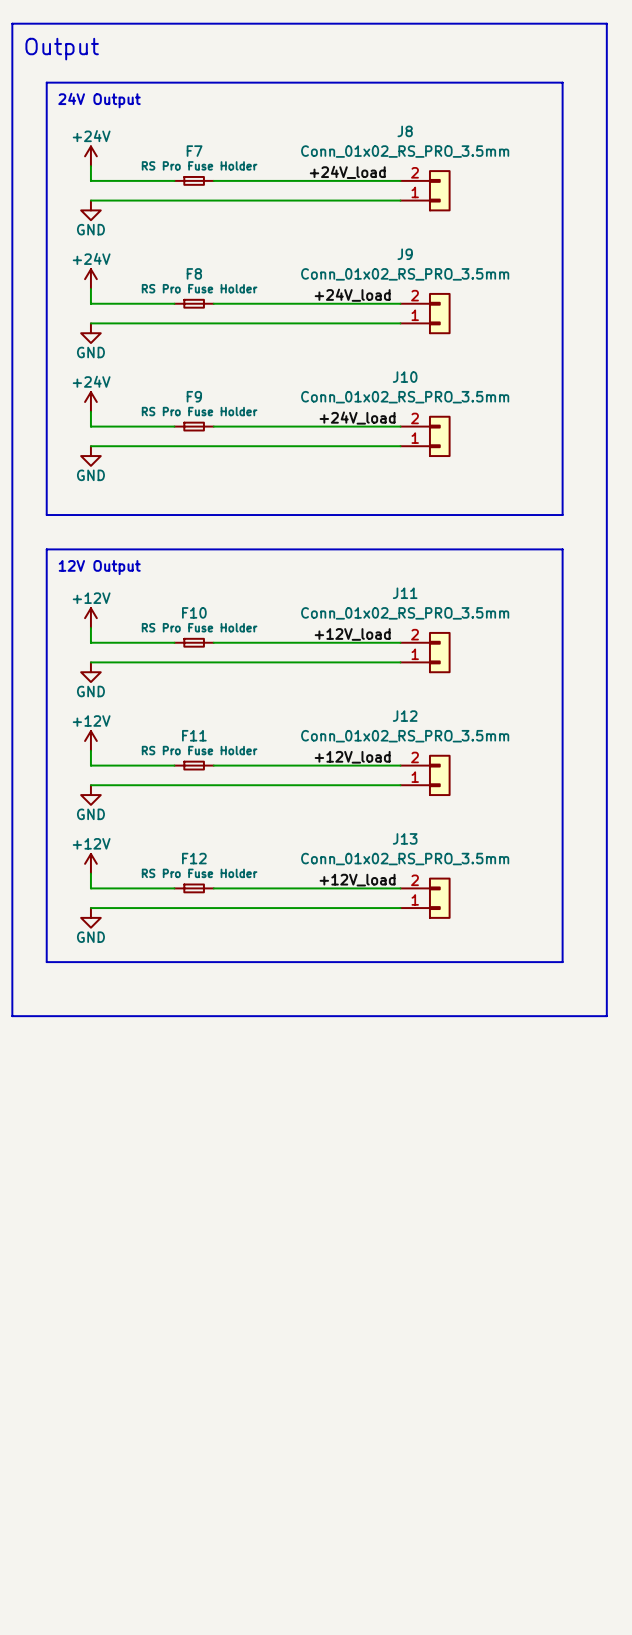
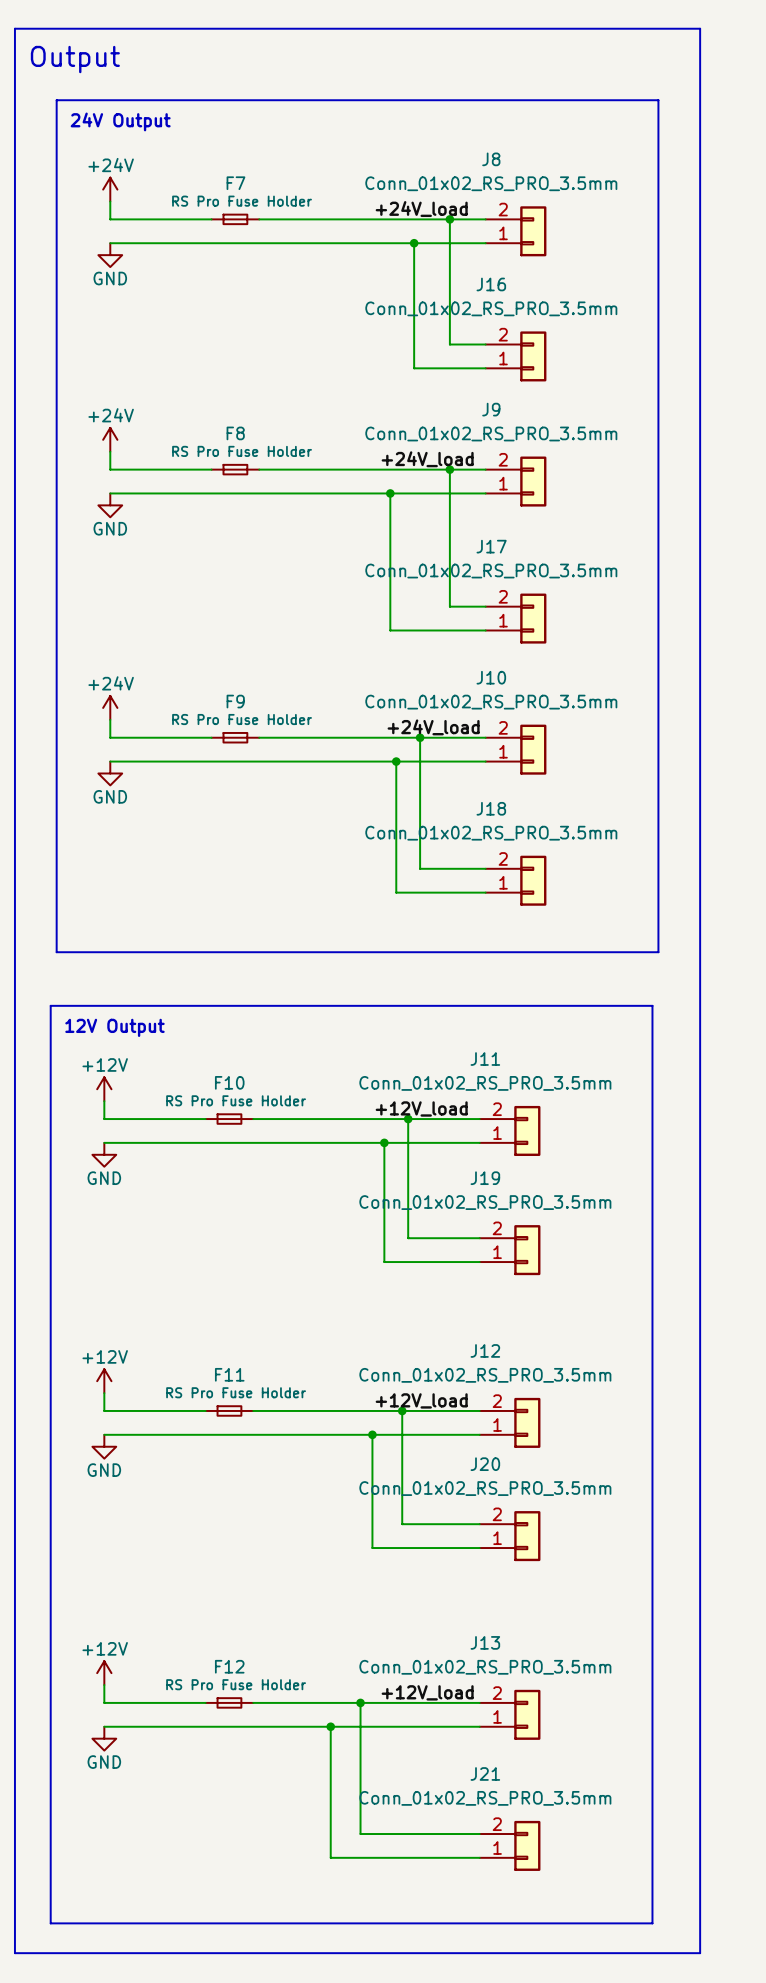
line: (577, 23) (606, 23) (606, 1016) (12, 1016) -> (700, 28) (700, 1953) (14, 1953) (14, 1232)
line: (542, 82) (562, 82) (562, 515) (46, 515) -> (658, 100) (658, 952) (56, 952)
wire: none -> (449, 219) (449, 344) (485, 344)
junction: none -> (449, 219)
junction: none -> (414, 243)
power symbol: +24V (90, 279) -> none
wire: (90, 289) (90, 303) (174, 303) -> none
J16: none -> Conn_01x02_RS_PRO_3.5mm (516, 356)
label: +24V_load (352, 295) -> none
F8 position: (194, 303) -> (235, 469)
wire: (213, 303) (341, 303) -> (414, 243) (414, 368)
J9 position: (425, 313) -> (516, 481)
wire: (90, 323) (400, 323) -> none
power symbol: GND (90, 333) -> none
wire: none -> (449, 469) (449, 606) (485, 606)
junction: none -> (449, 469)
power symbol position: +24V (90, 402) -> +24V (110, 439)
wire: none -> (390, 493) (390, 630) (485, 630)
junction: none -> (390, 493)
wire: (90, 411) (90, 426) (174, 426) -> (110, 451) (110, 469) (211, 469)
label position: +24V_load (357, 418) -> +24V_load (427, 459)
F9 position: (194, 426) -> (235, 737)
wire: (213, 426) (400, 426) -> (259, 469) (485, 469)
J10 position: (425, 436) -> (516, 749)
wire: (90, 446) (400, 446) -> (110, 493) (485, 493)
power symbol position: GND (90, 456) -> GND (110, 505)
J17: none -> Conn_01x02_RS_PRO_3.5mm (516, 618)
line: (46, 549) (562, 549) (562, 962) (46, 962) (46, 785) -> (56, 666) (56, 624)
text: 12V Output (99, 567) -> none
power symbol: none -> +24V (110, 707)
label: none -> +24V_load (433, 727)
wire: none -> (420, 737) (420, 868) (485, 868)
junction: none -> (420, 737)
power symbol: +12V (90, 618) -> none
wire: (90, 628) (90, 642) (174, 642) -> (110, 761) (485, 761)
wire: none -> (396, 761) (396, 892) (485, 892)
junction: none -> (396, 761)
label: +12V_load (352, 634) -> none
F10 position: (194, 642) -> (229, 1119)
wire: (213, 642) (400, 642) -> (259, 737) (485, 737)
J11 position: (425, 652) -> (510, 1130)
wire: (90, 662) (400, 662) -> none
power symbol position: GND (90, 672) -> GND (110, 773)
J18: none -> Conn_01x02_RS_PRO_3.5mm (516, 880)
power symbol: +12V (90, 741) -> none
wire: (90, 750) (90, 765) (174, 765) -> (110, 719) (110, 737) (211, 737)
label: +12V_load (352, 757) -> none
F11 position: (194, 765) -> (229, 1410)
wire: (213, 765) (400, 765) -> none
J12 position: (425, 775) -> (510, 1422)
power symbol: GND (90, 795) -> none
line: none -> (50, 1005) (652, 1005) (652, 1923) (50, 1923) (50, 1005)
text: none -> 12V Output (114, 1027)
power symbol position: +12V (90, 863) -> +12V (104, 1089)
wire: (90, 873) (90, 888) (174, 888) -> (104, 1101) (104, 1119) (205, 1119)
label position: +12V_load (357, 880) -> +12V_load (421, 1108)
F12 position: (194, 888) -> (229, 1702)
wire: (213, 888) (400, 888) -> (253, 1119) (479, 1119)
J13 position: (425, 898) -> (510, 1714)
wire: (90, 908) (400, 908) -> (104, 1142) (479, 1142)
power symbol position: GND (90, 917) -> GND (104, 1154)
wire: none -> (408, 1119) (408, 1238) (479, 1238)
junction: none -> (408, 1119)
wire: none -> (384, 1142) (384, 1262) (479, 1262)
junction: none -> (384, 1142)
J19: none -> Conn_01x02_RS_PRO_3.5mm (510, 1250)
power symbol: none -> +12V (104, 1381)
wire: none -> (104, 1393) (104, 1410) (205, 1410)
label: none -> +12V_load (421, 1400)
wire: none -> (253, 1410) (479, 1410)
wire: none -> (402, 1410) (402, 1524) (479, 1524)
junction: none -> (402, 1410)
wire: none -> (104, 1434) (479, 1434)
wire: none -> (372, 1434) (372, 1548) (479, 1548)
junction: none -> (372, 1434)
power symbol: none -> GND (104, 1446)
J20: none -> Conn_01x02_RS_PRO_3.5mm (510, 1536)
power symbol: none -> +12V (104, 1673)
wire: none -> (104, 1685) (104, 1702) (205, 1702)
label: none -> +12V_load (427, 1692)
wire: none -> (253, 1702) (479, 1702)
wire: none -> (360, 1702) (360, 1834) (479, 1834)
junction: none -> (360, 1702)
wire: none -> (104, 1726) (479, 1726)
wire: none -> (330, 1726) (330, 1857) (479, 1857)
junction: none -> (330, 1726)
power symbol: none -> GND (104, 1738)
J21: none -> Conn_01x02_RS_PRO_3.5mm (510, 1845)

